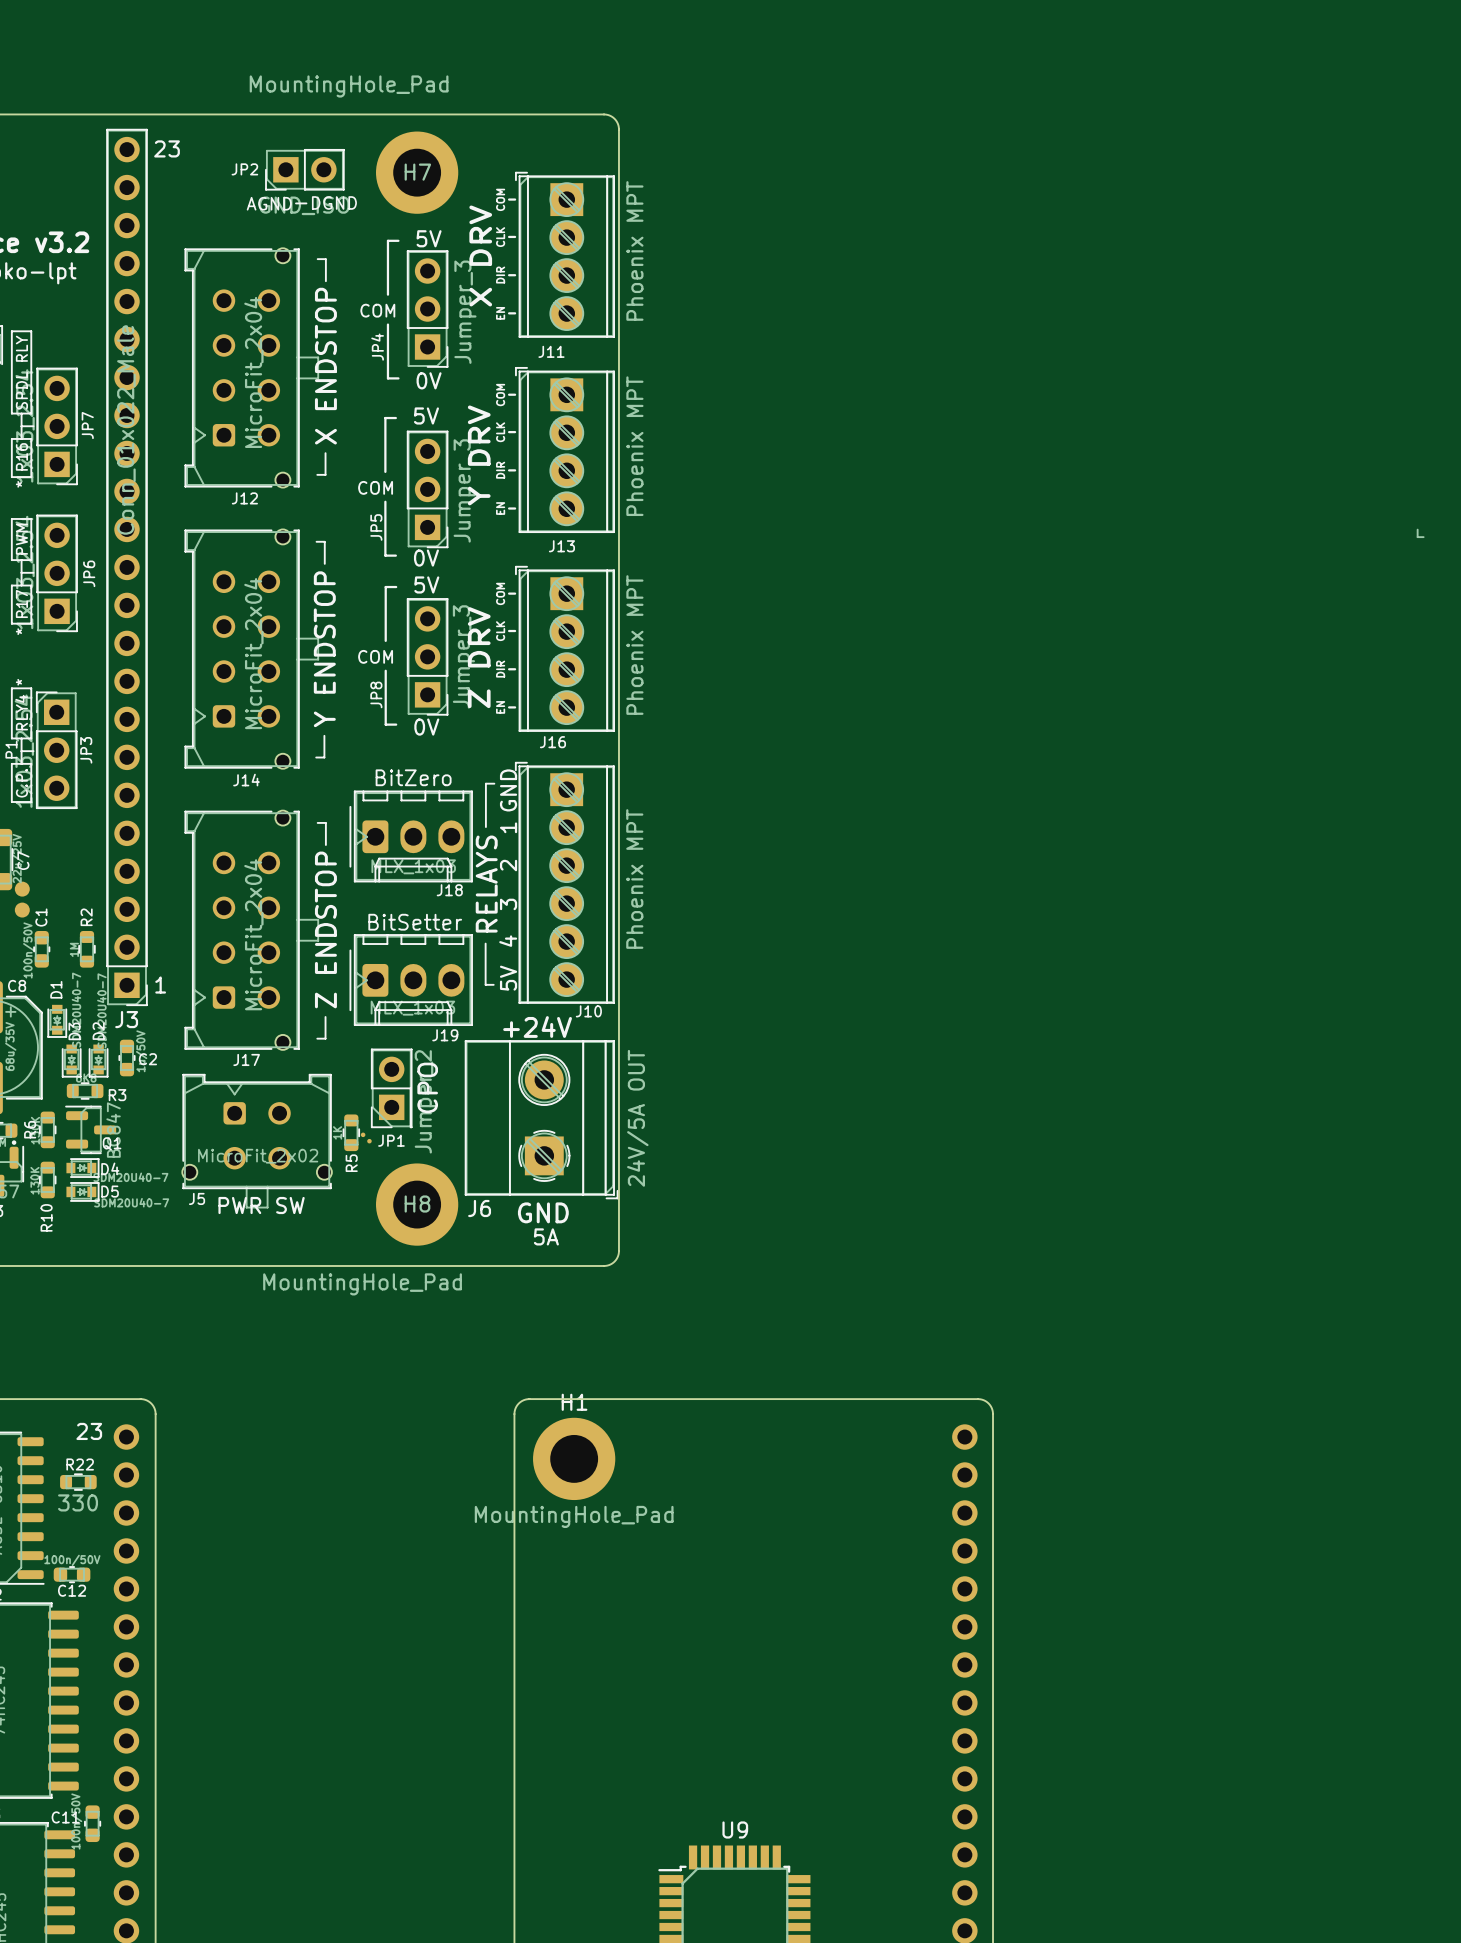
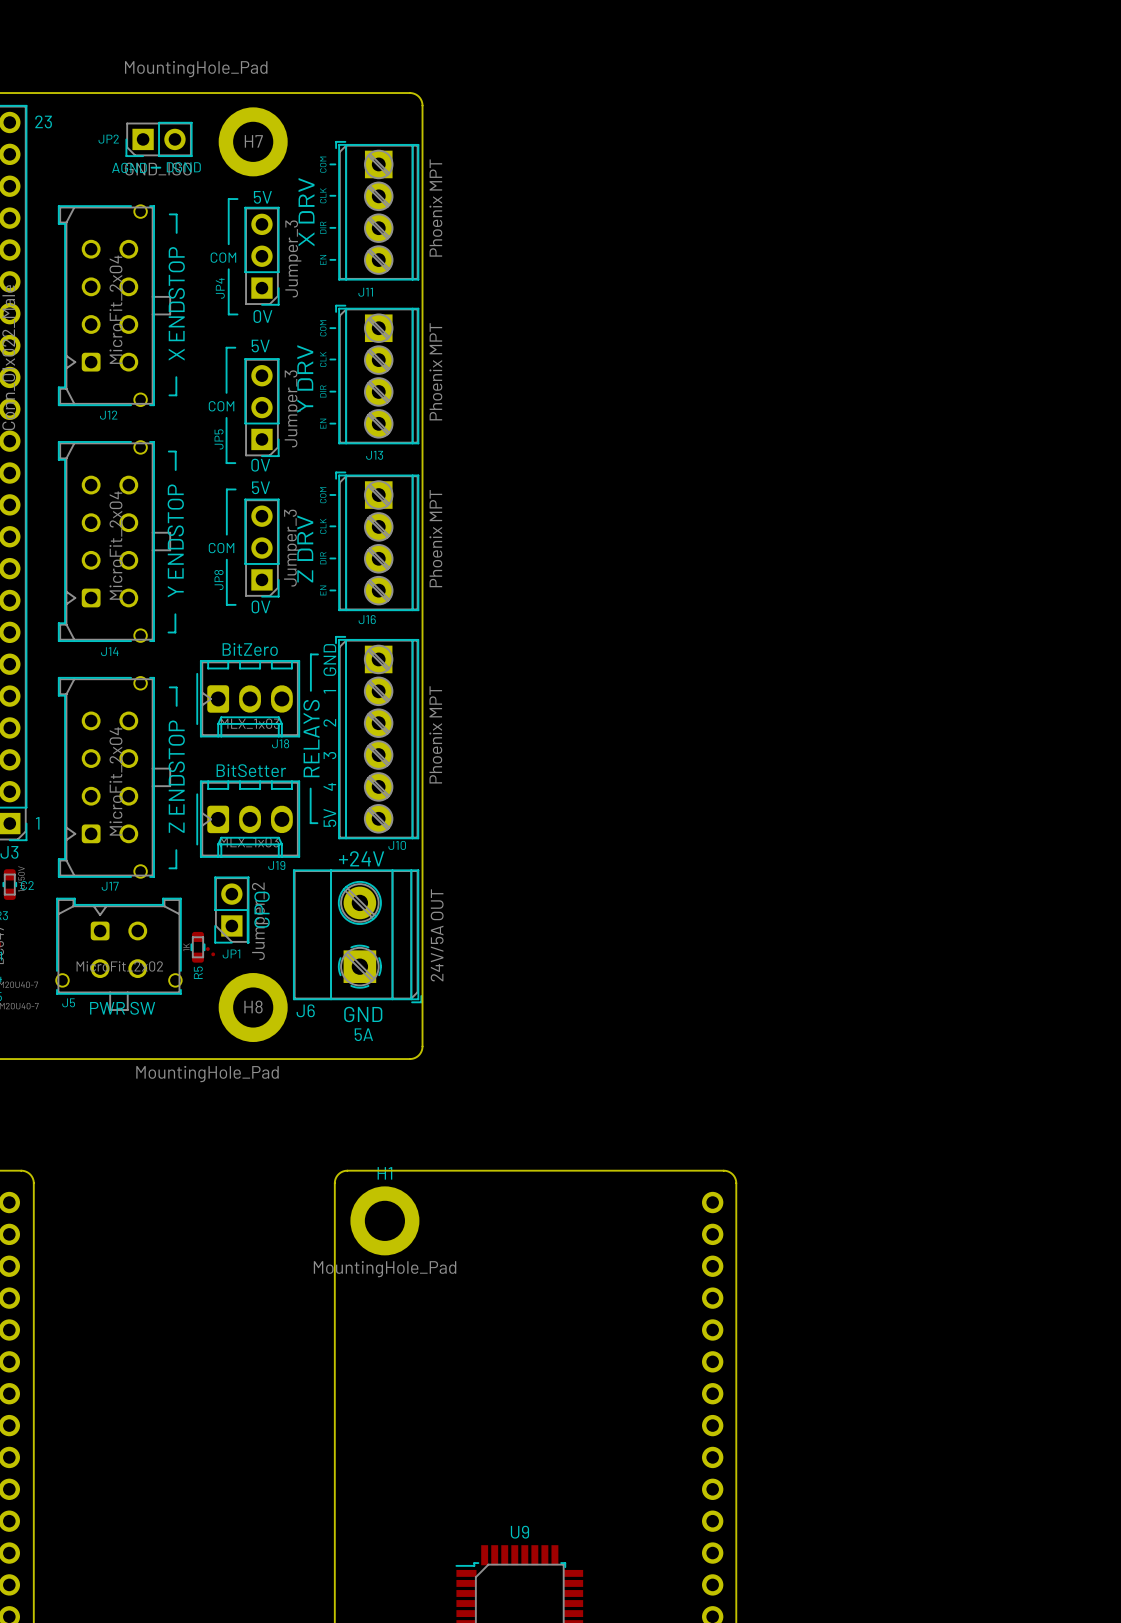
line: (1417, 529) (1417, 537) (1423, 537) -> none

